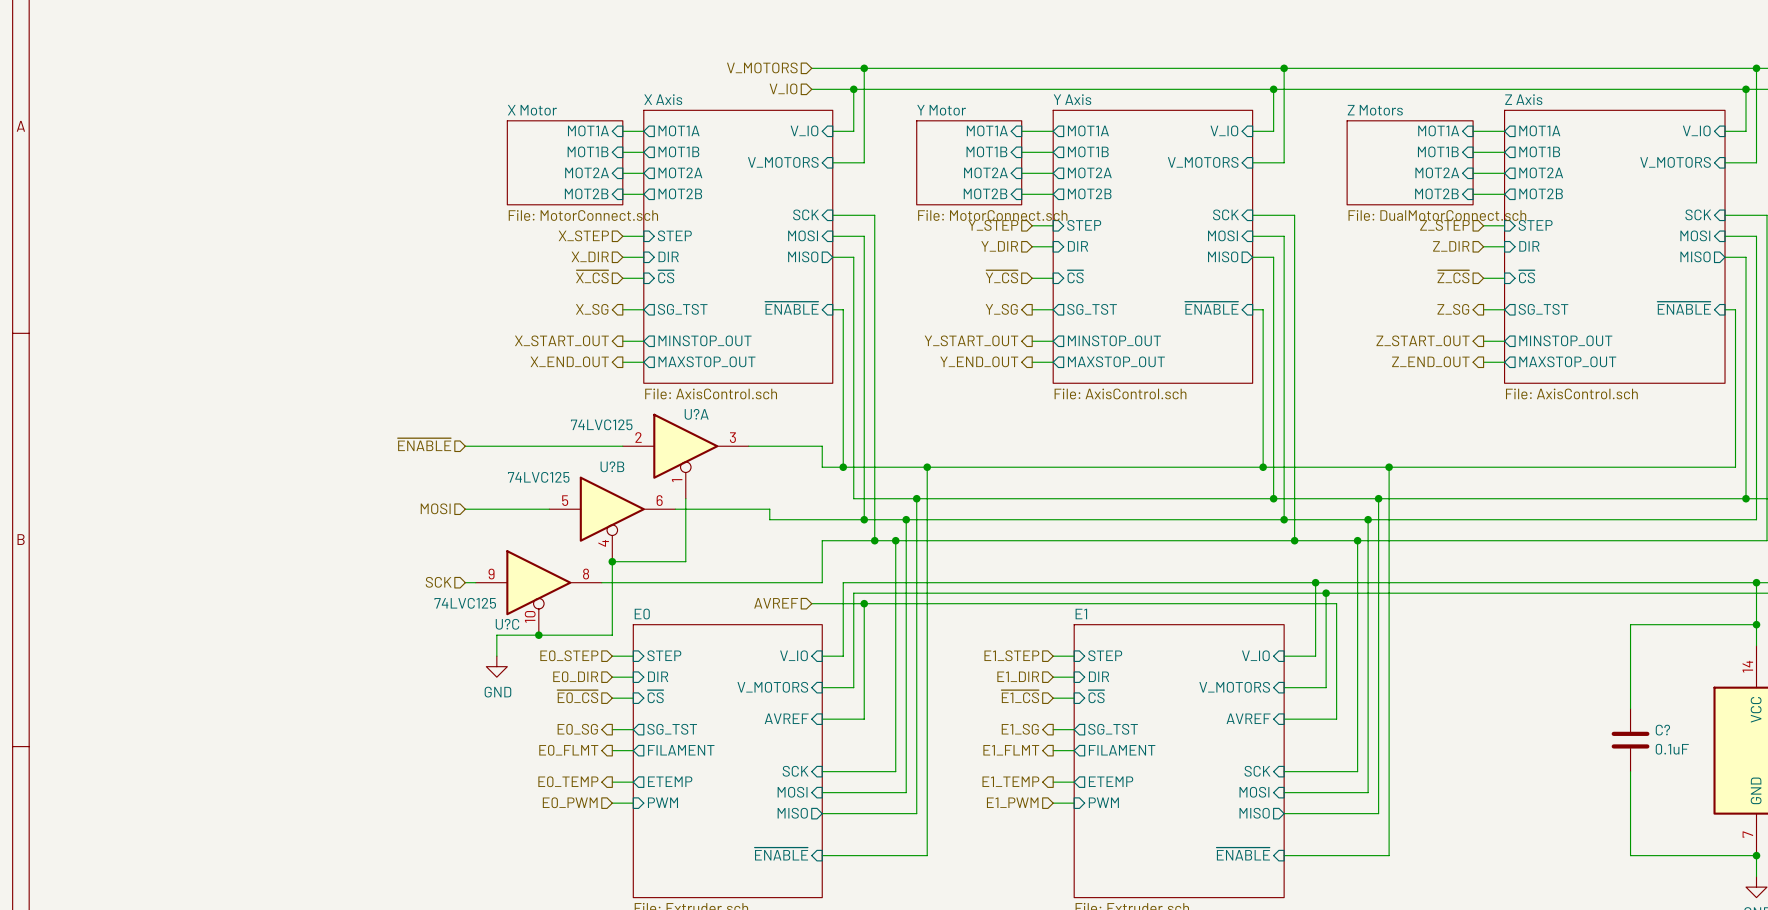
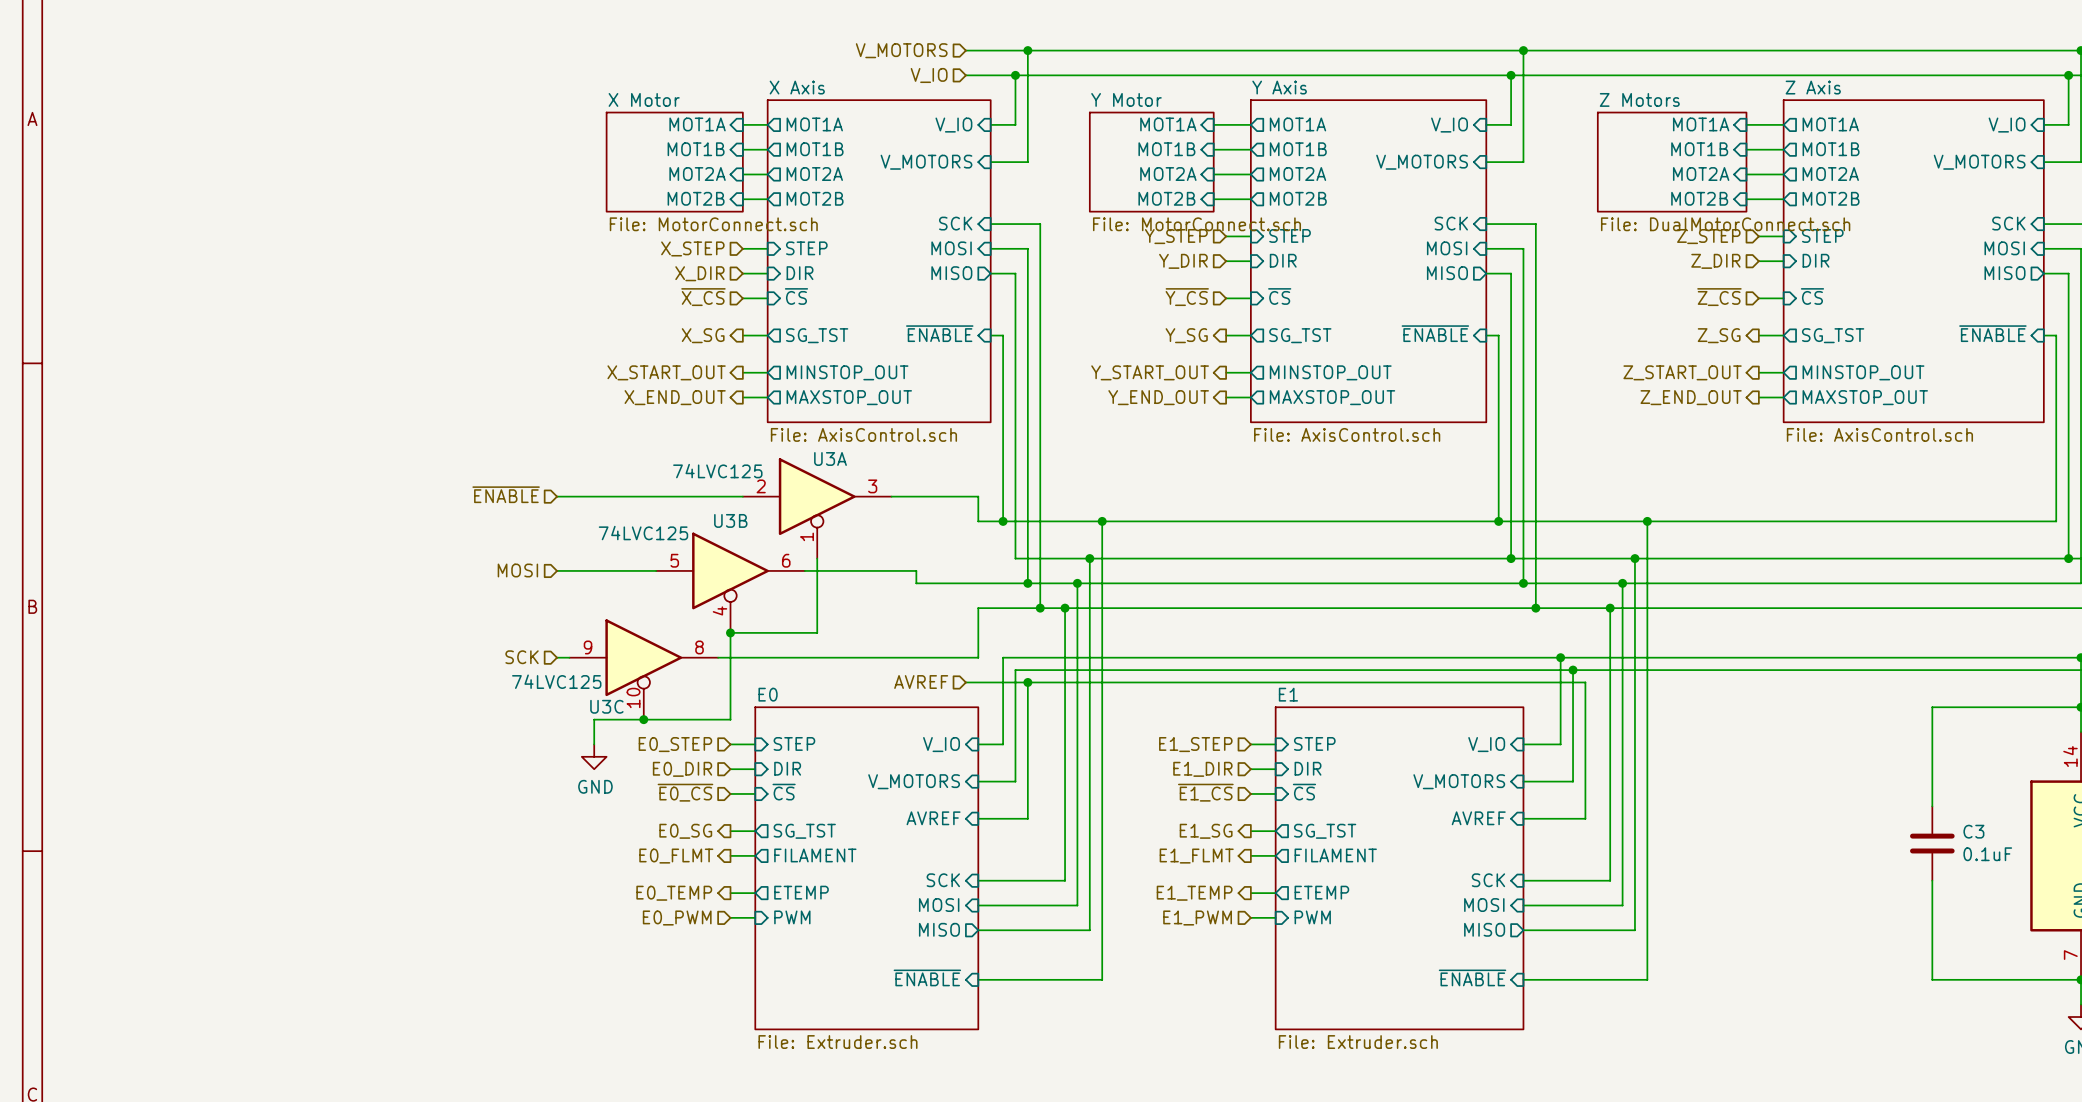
U?A name: U?A (696, 414) -> U3A (830, 458)
U?B name: U?B (612, 466) -> U3B (730, 520)
U?C name: U?C (507, 624) -> U3C (606, 706)
C? name: C? (1662, 730) -> C3 (1973, 831)

